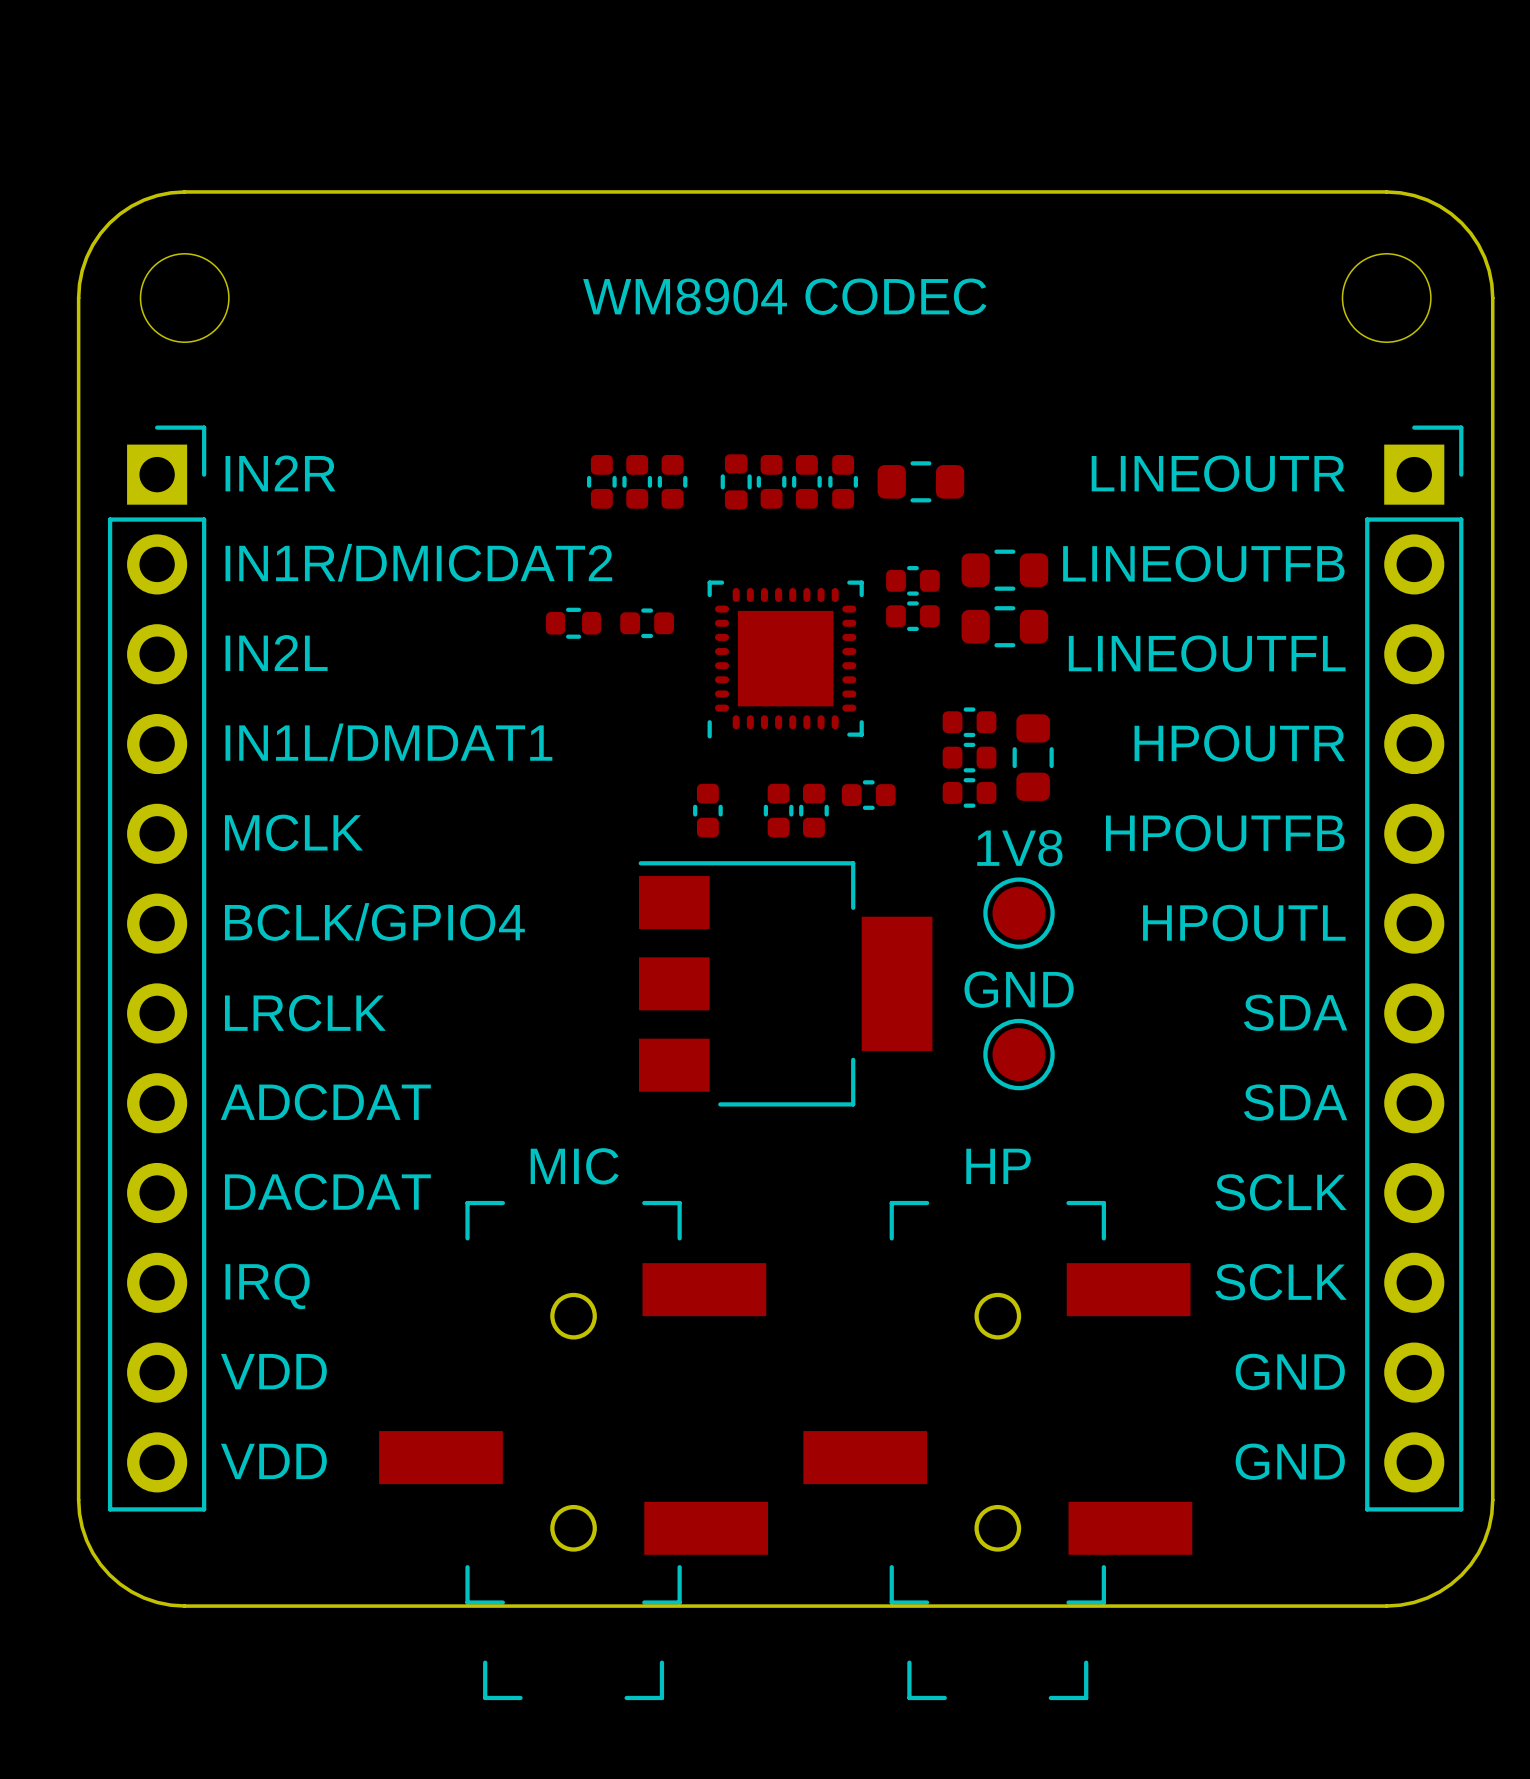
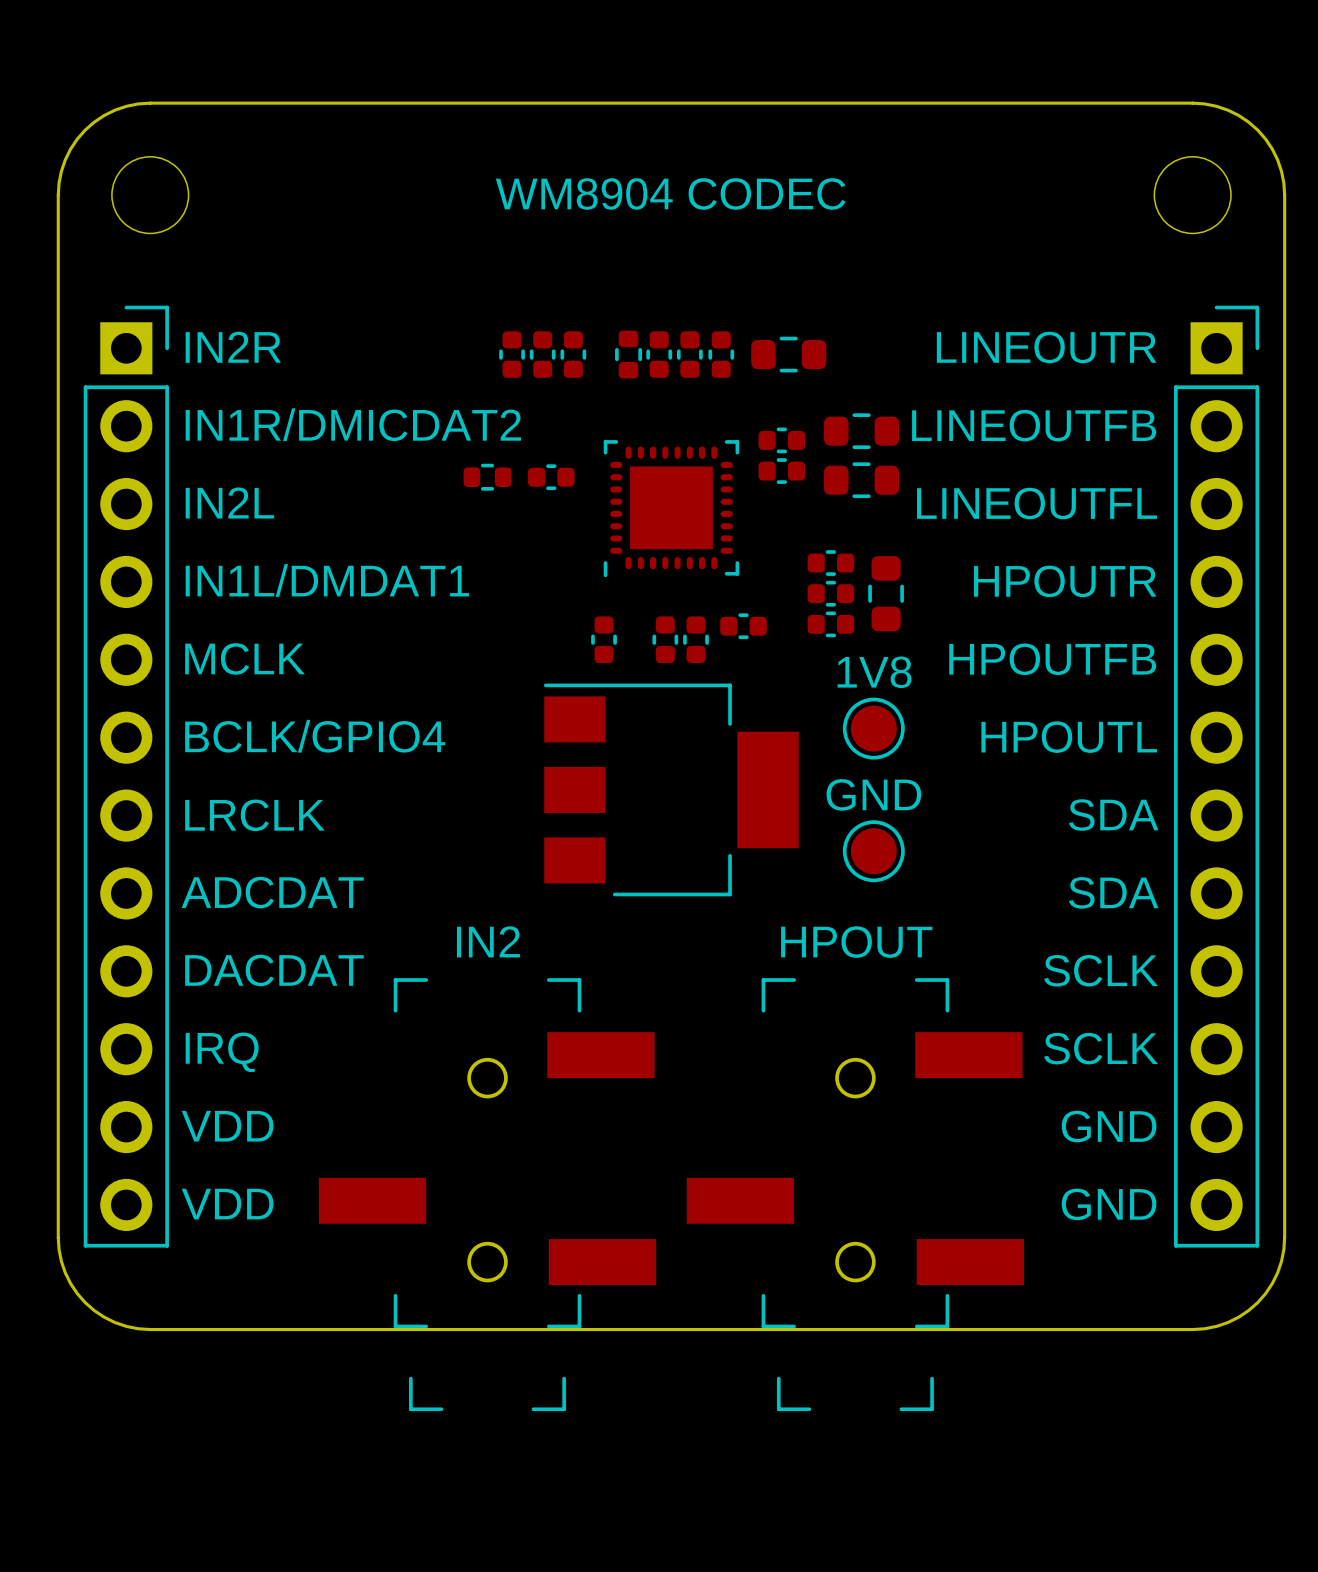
text: MIC (574, 1166) -> IN2 (488, 941)
text: HP (998, 1166) -> HPOUT (856, 942)

